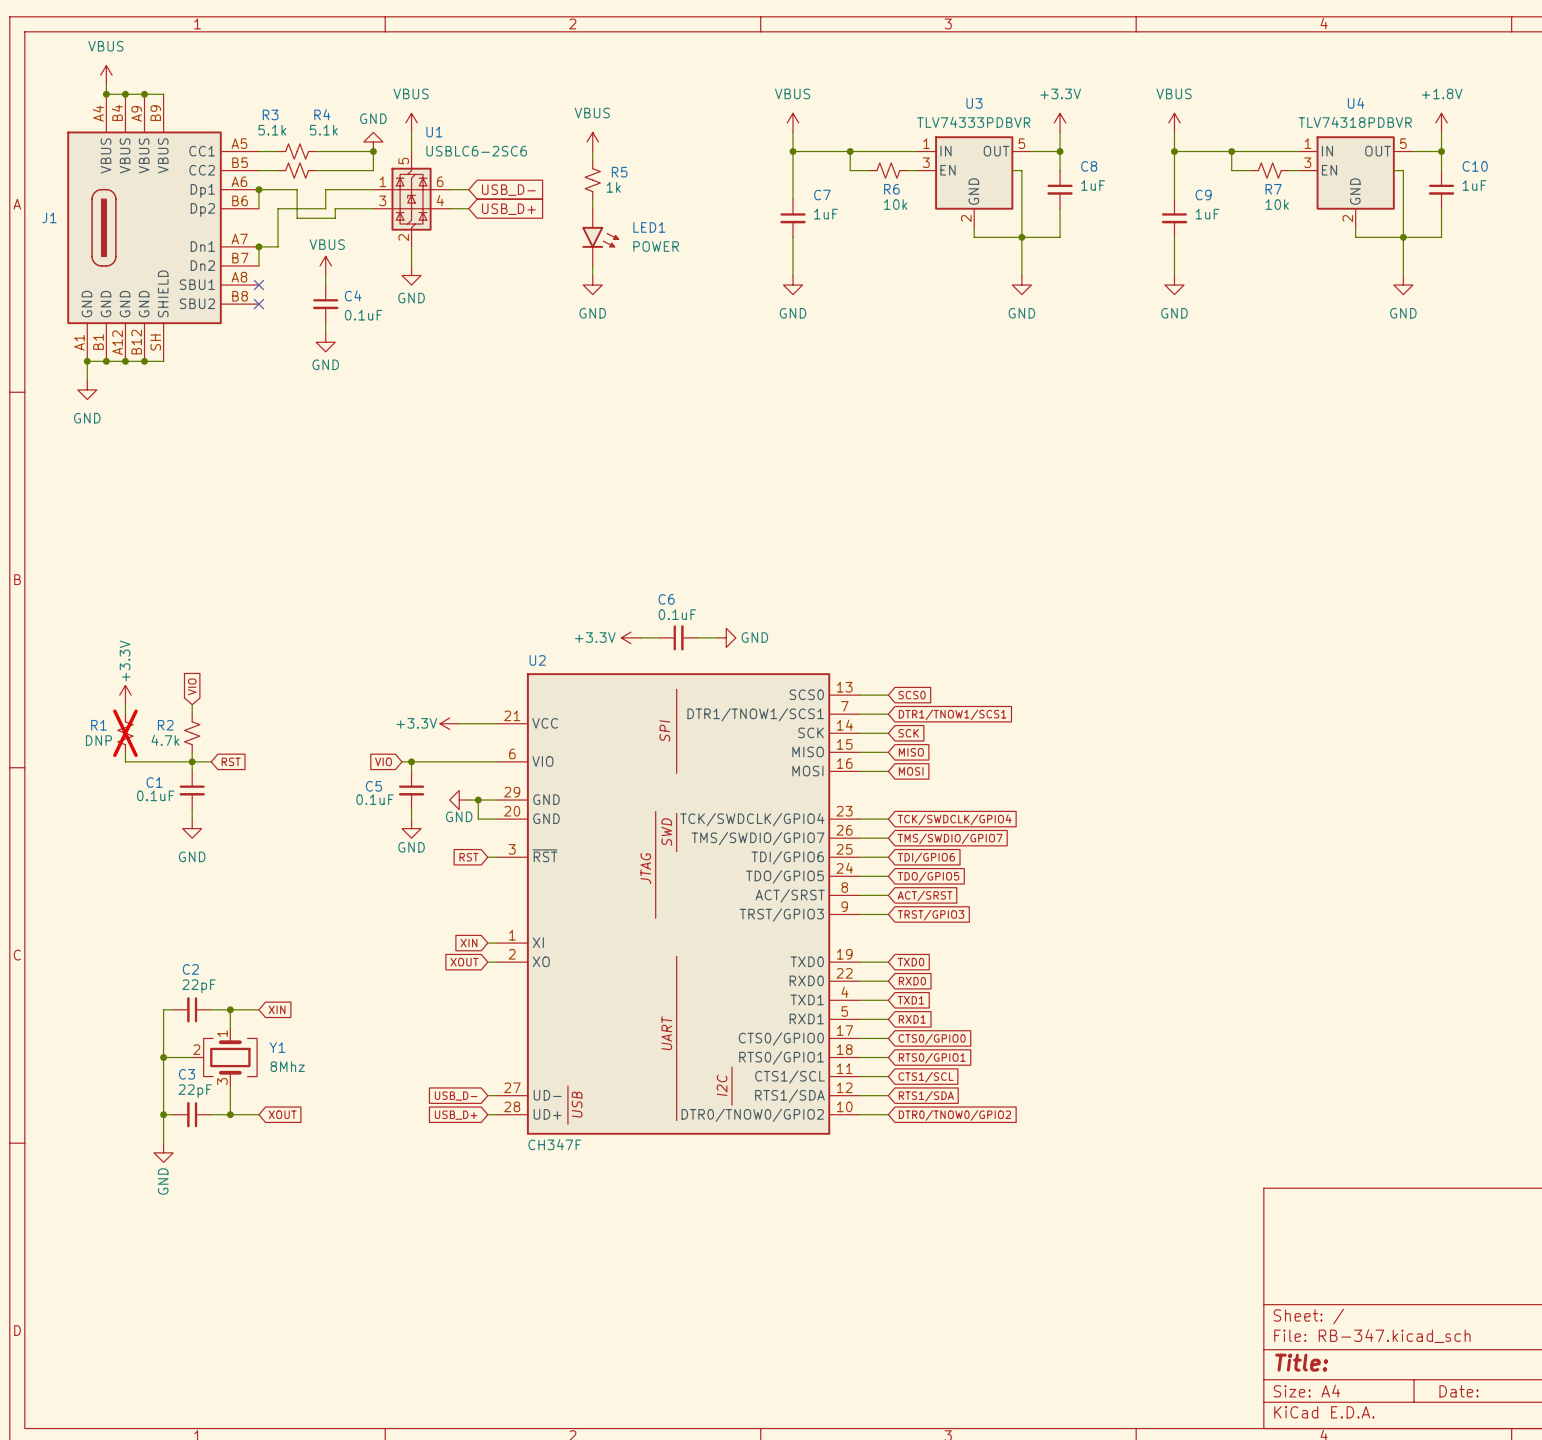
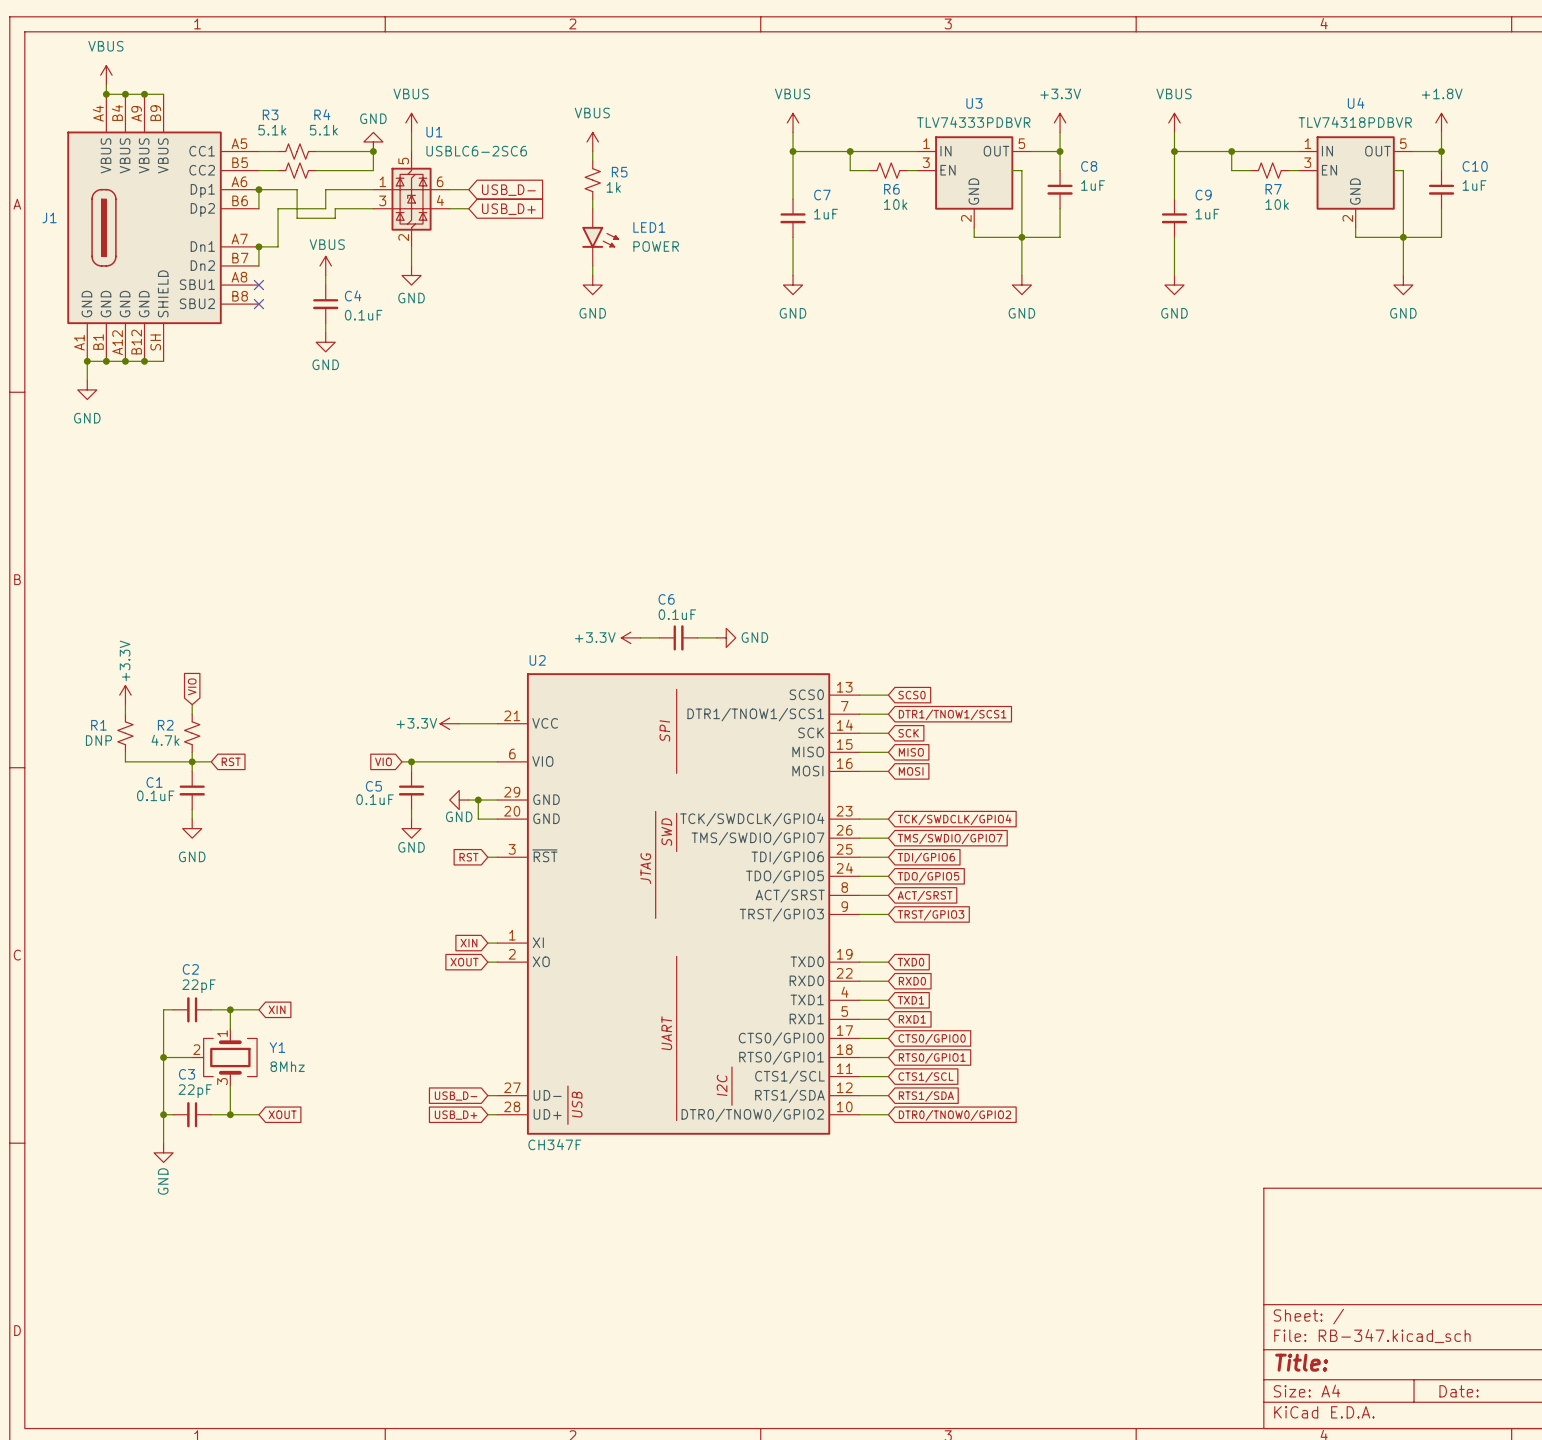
R1 do-not-place cross: (125, 733) -> none

